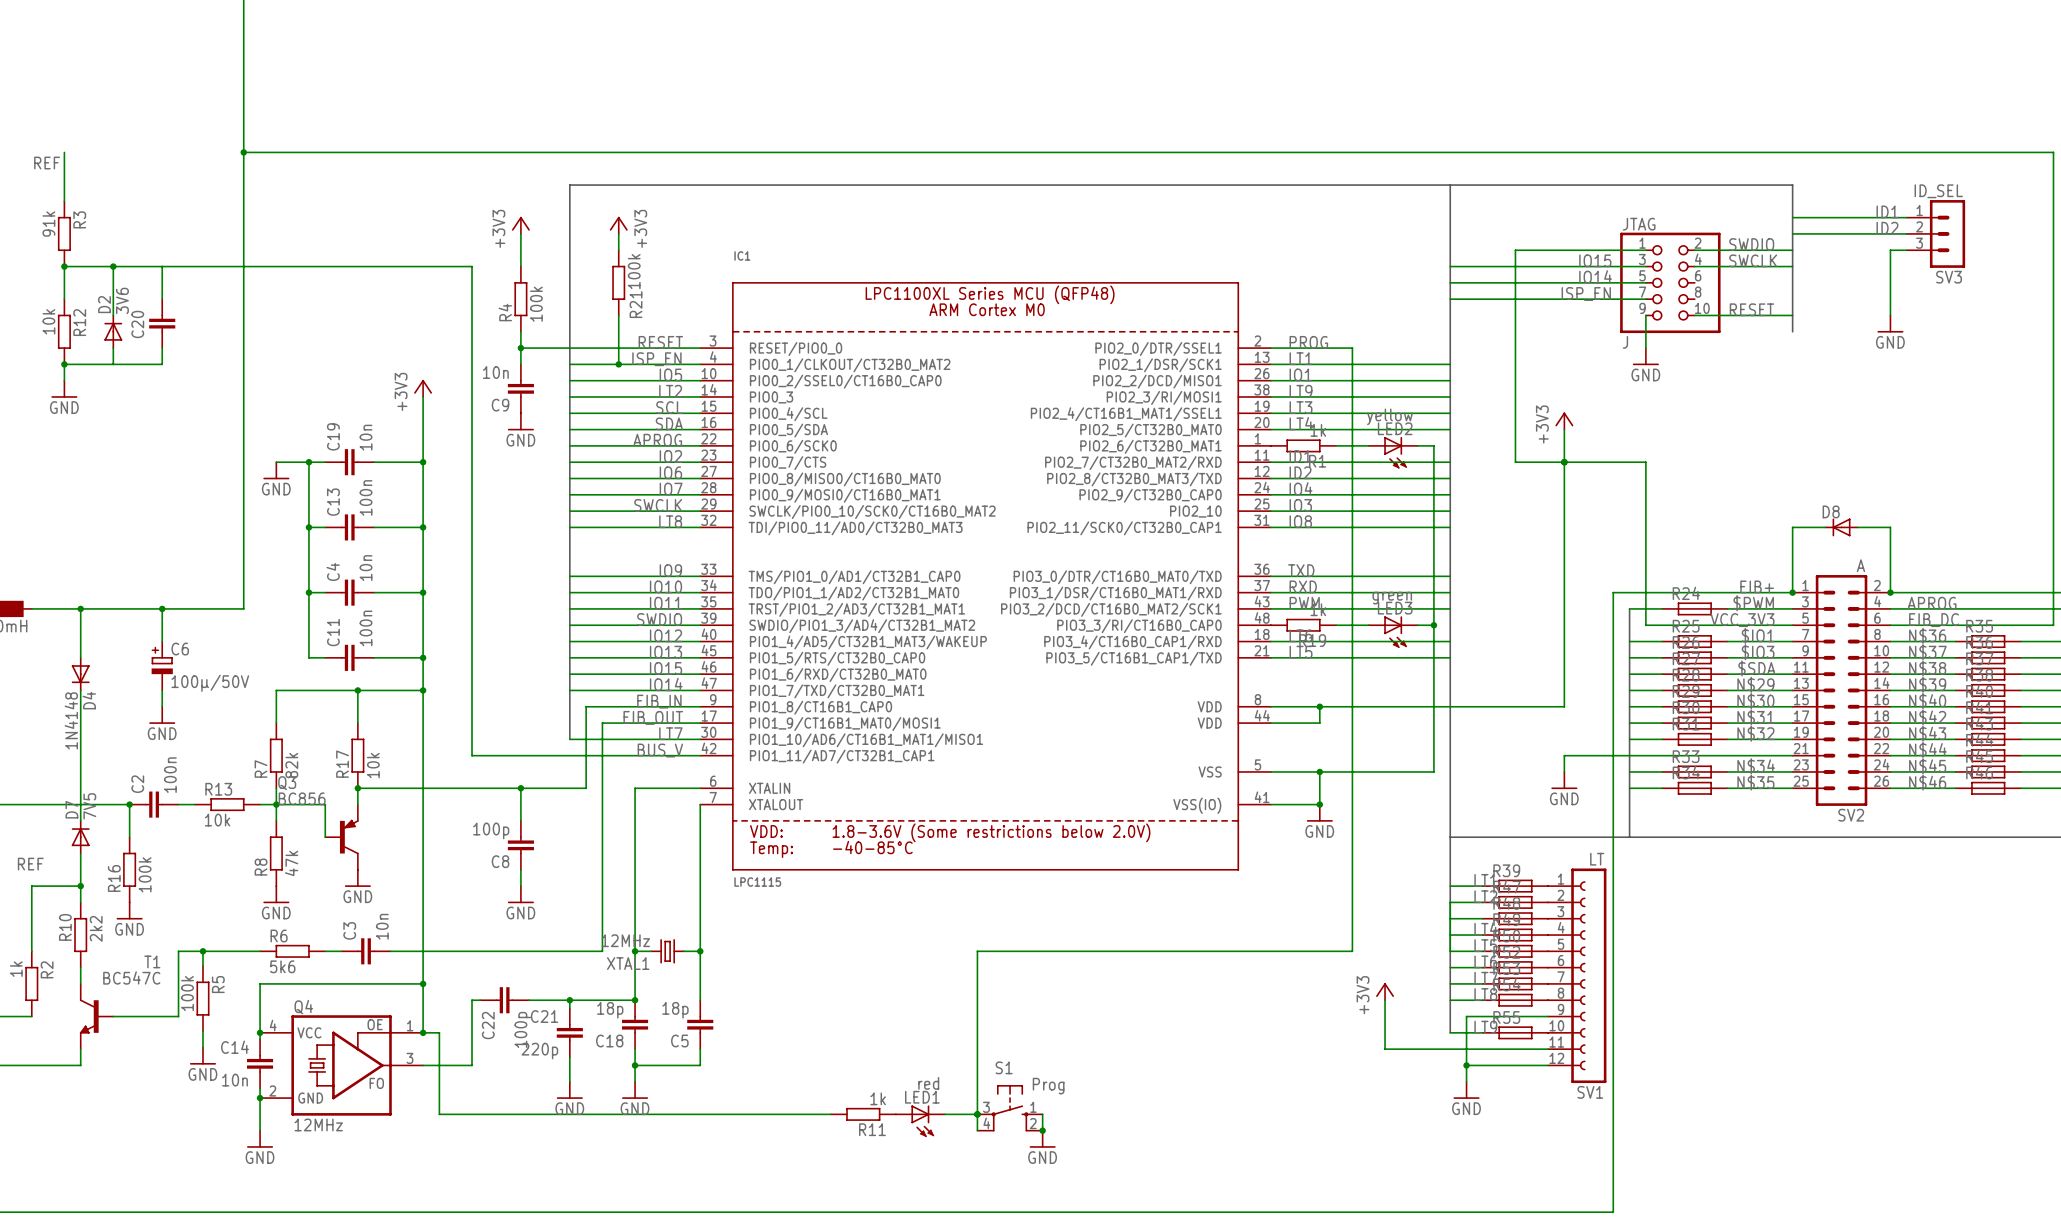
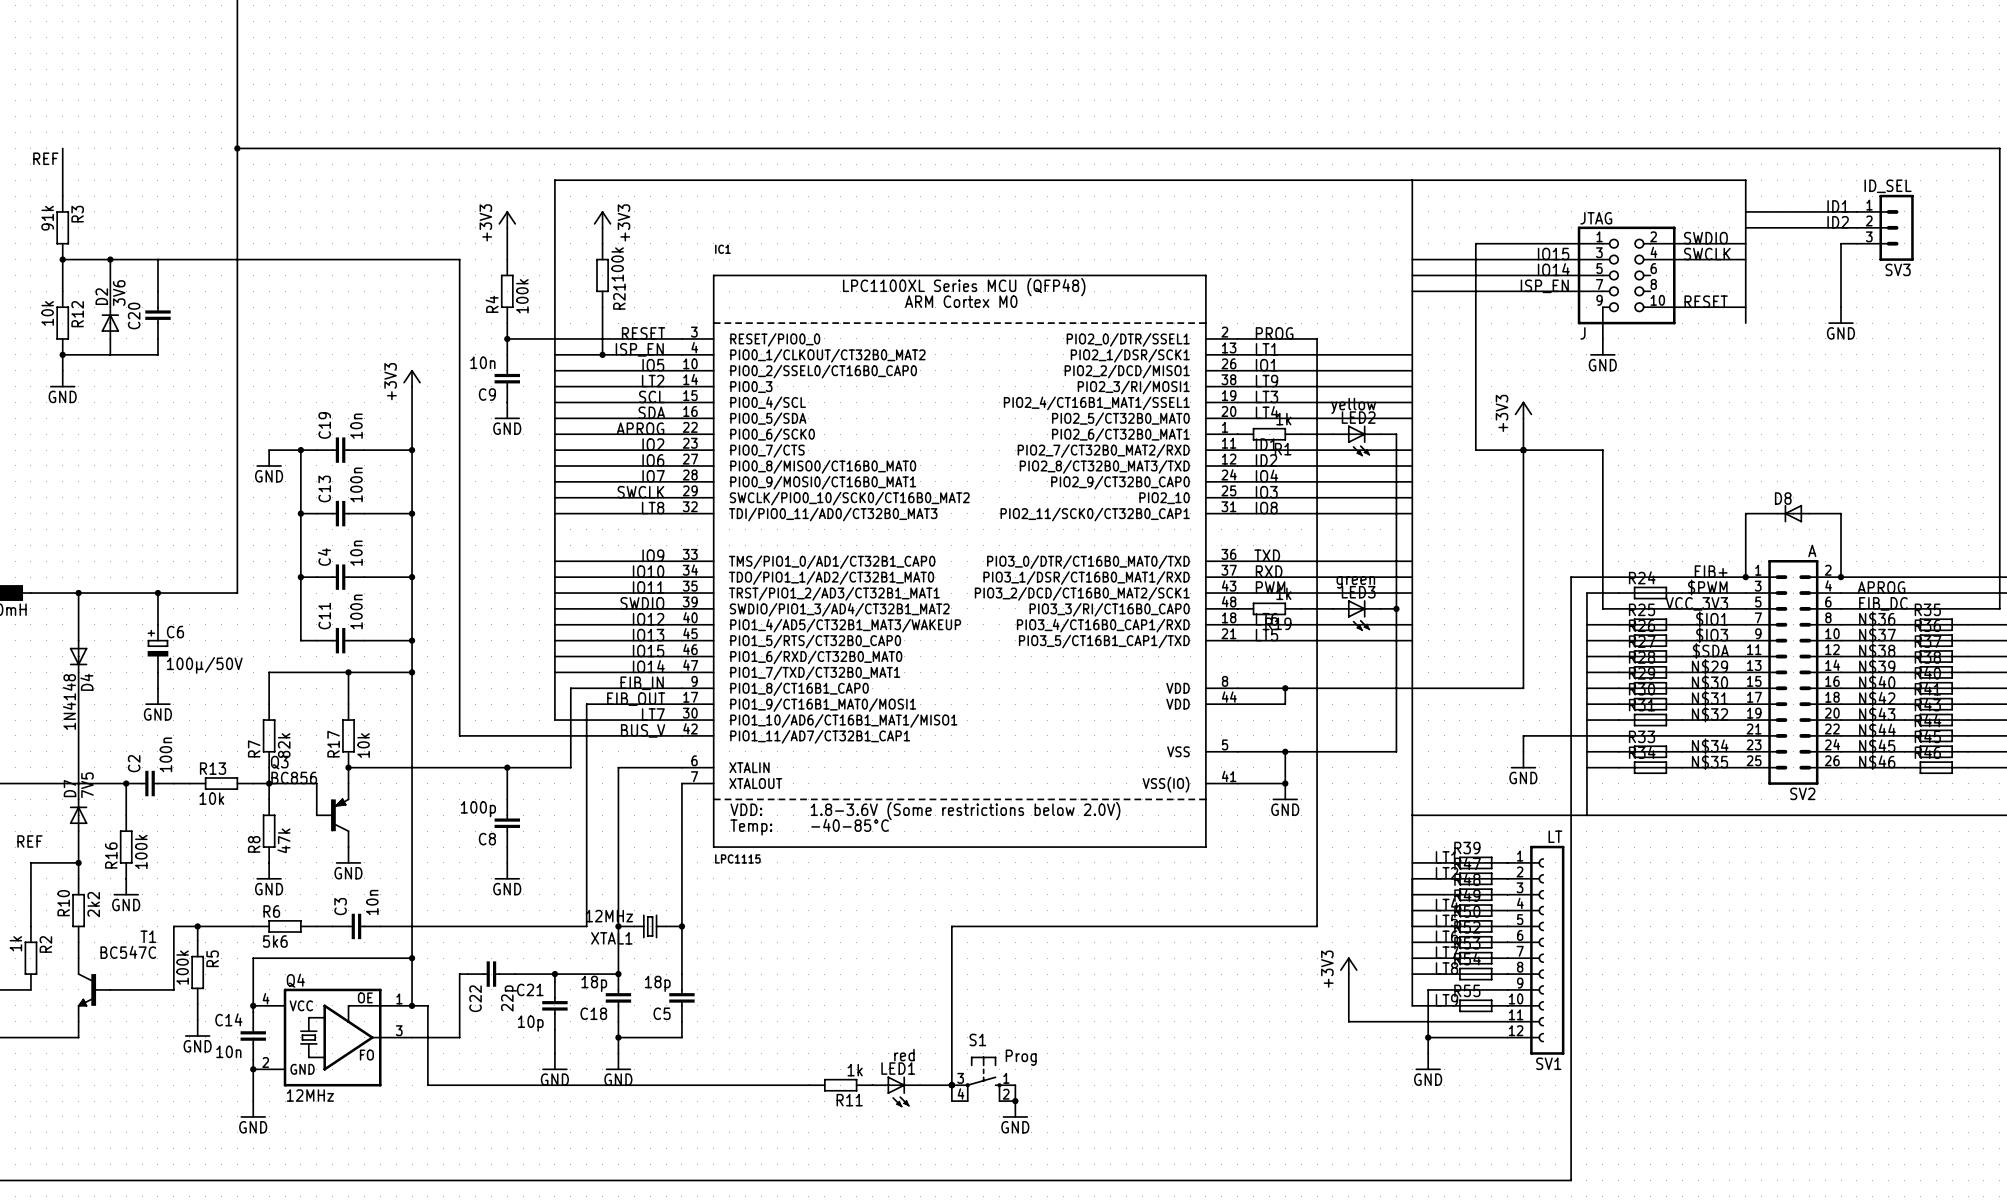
C22 value: 100p (522, 1029) -> 22p (509, 998)
C21 value: 220p (539, 1051) -> 10p (530, 1023)

